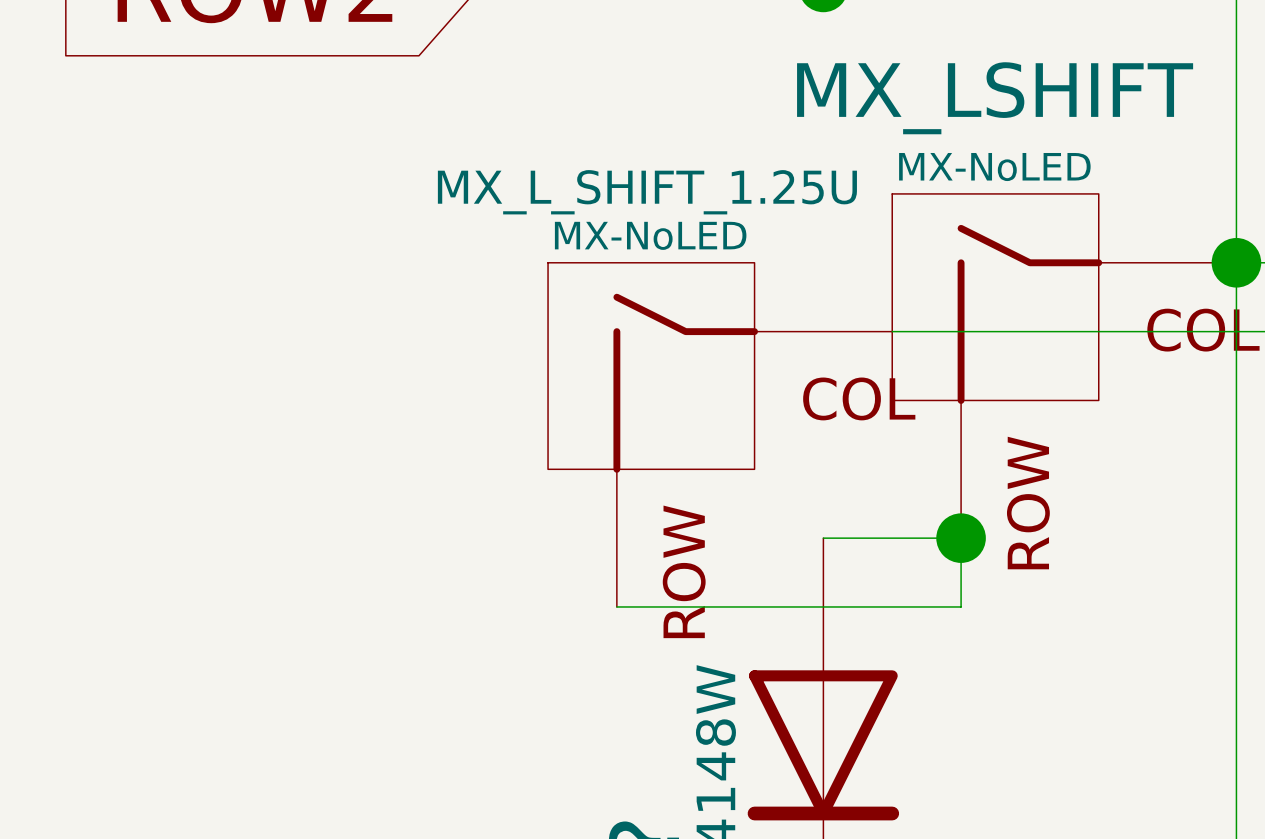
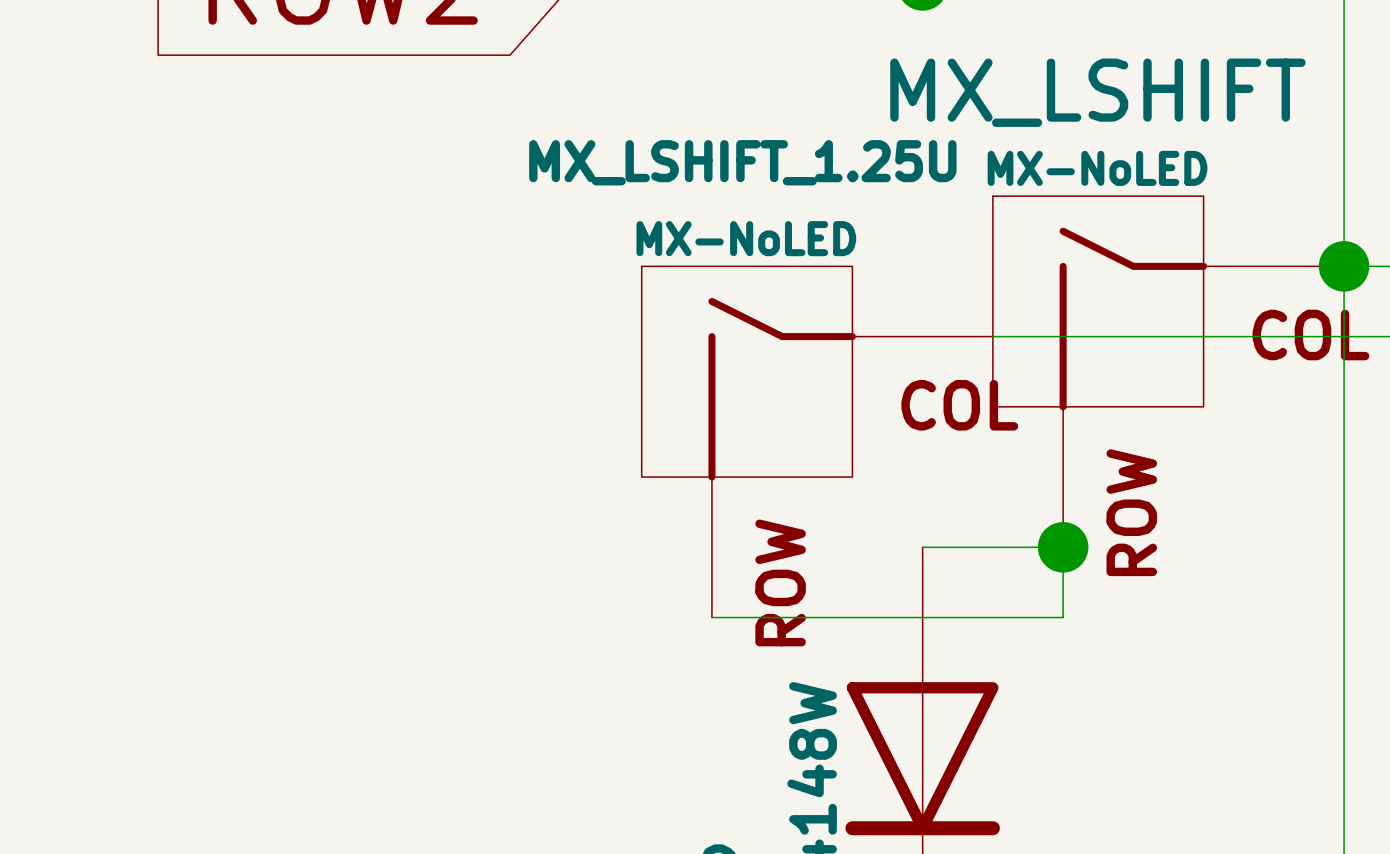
MX_L_SHIFT_1.25U name: MX_L_SHIFT_1.25U (647, 192) -> MX_LSHIFT_1.25U (742, 162)

